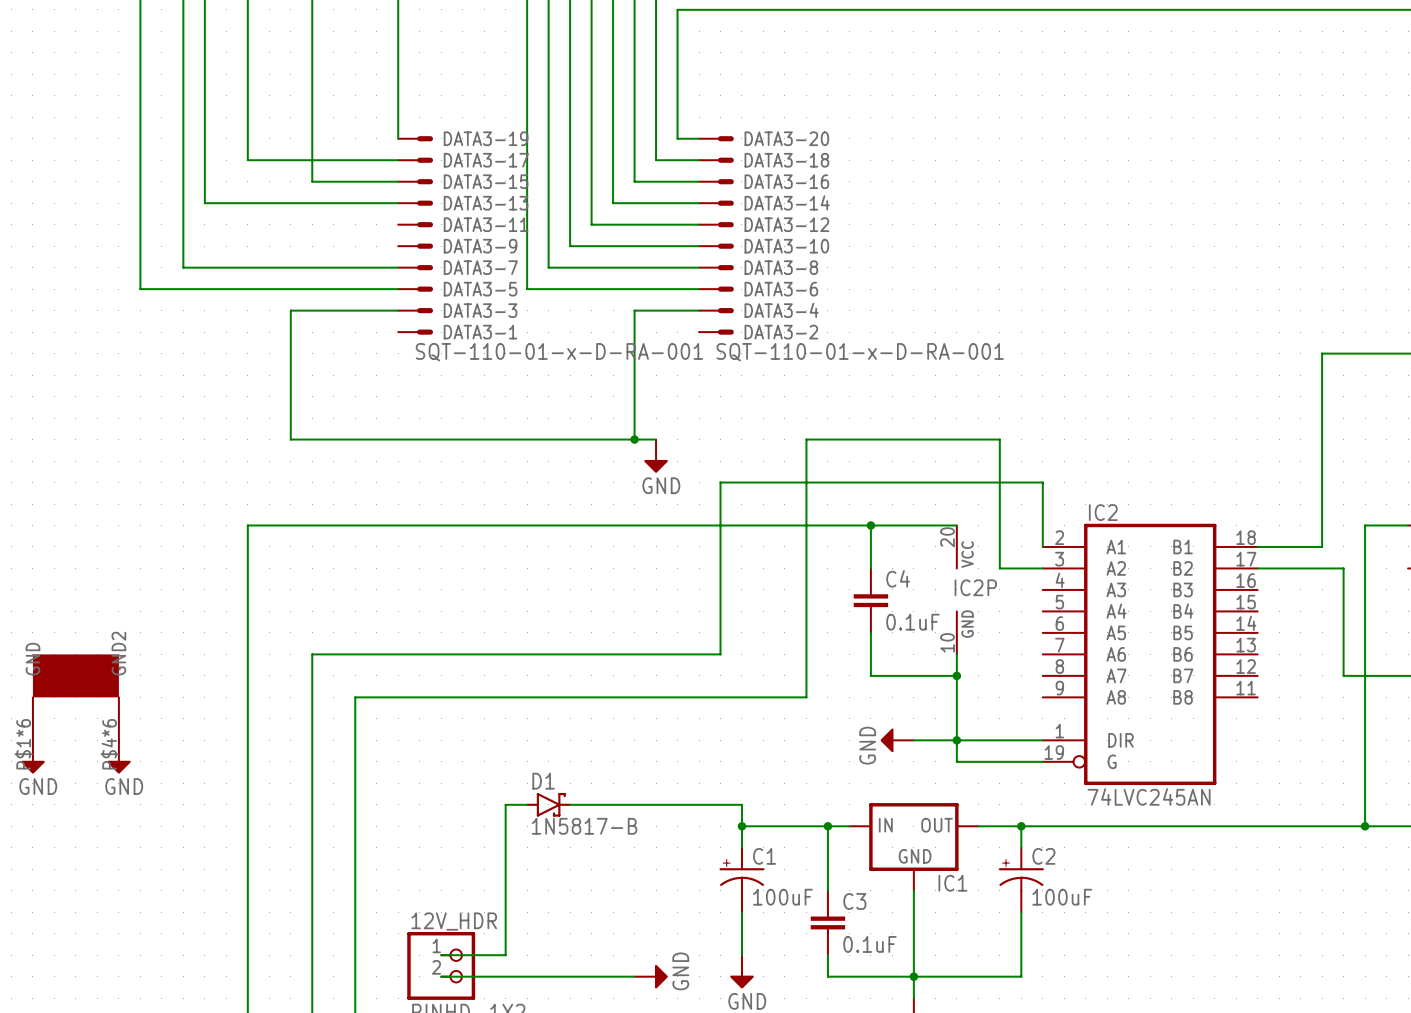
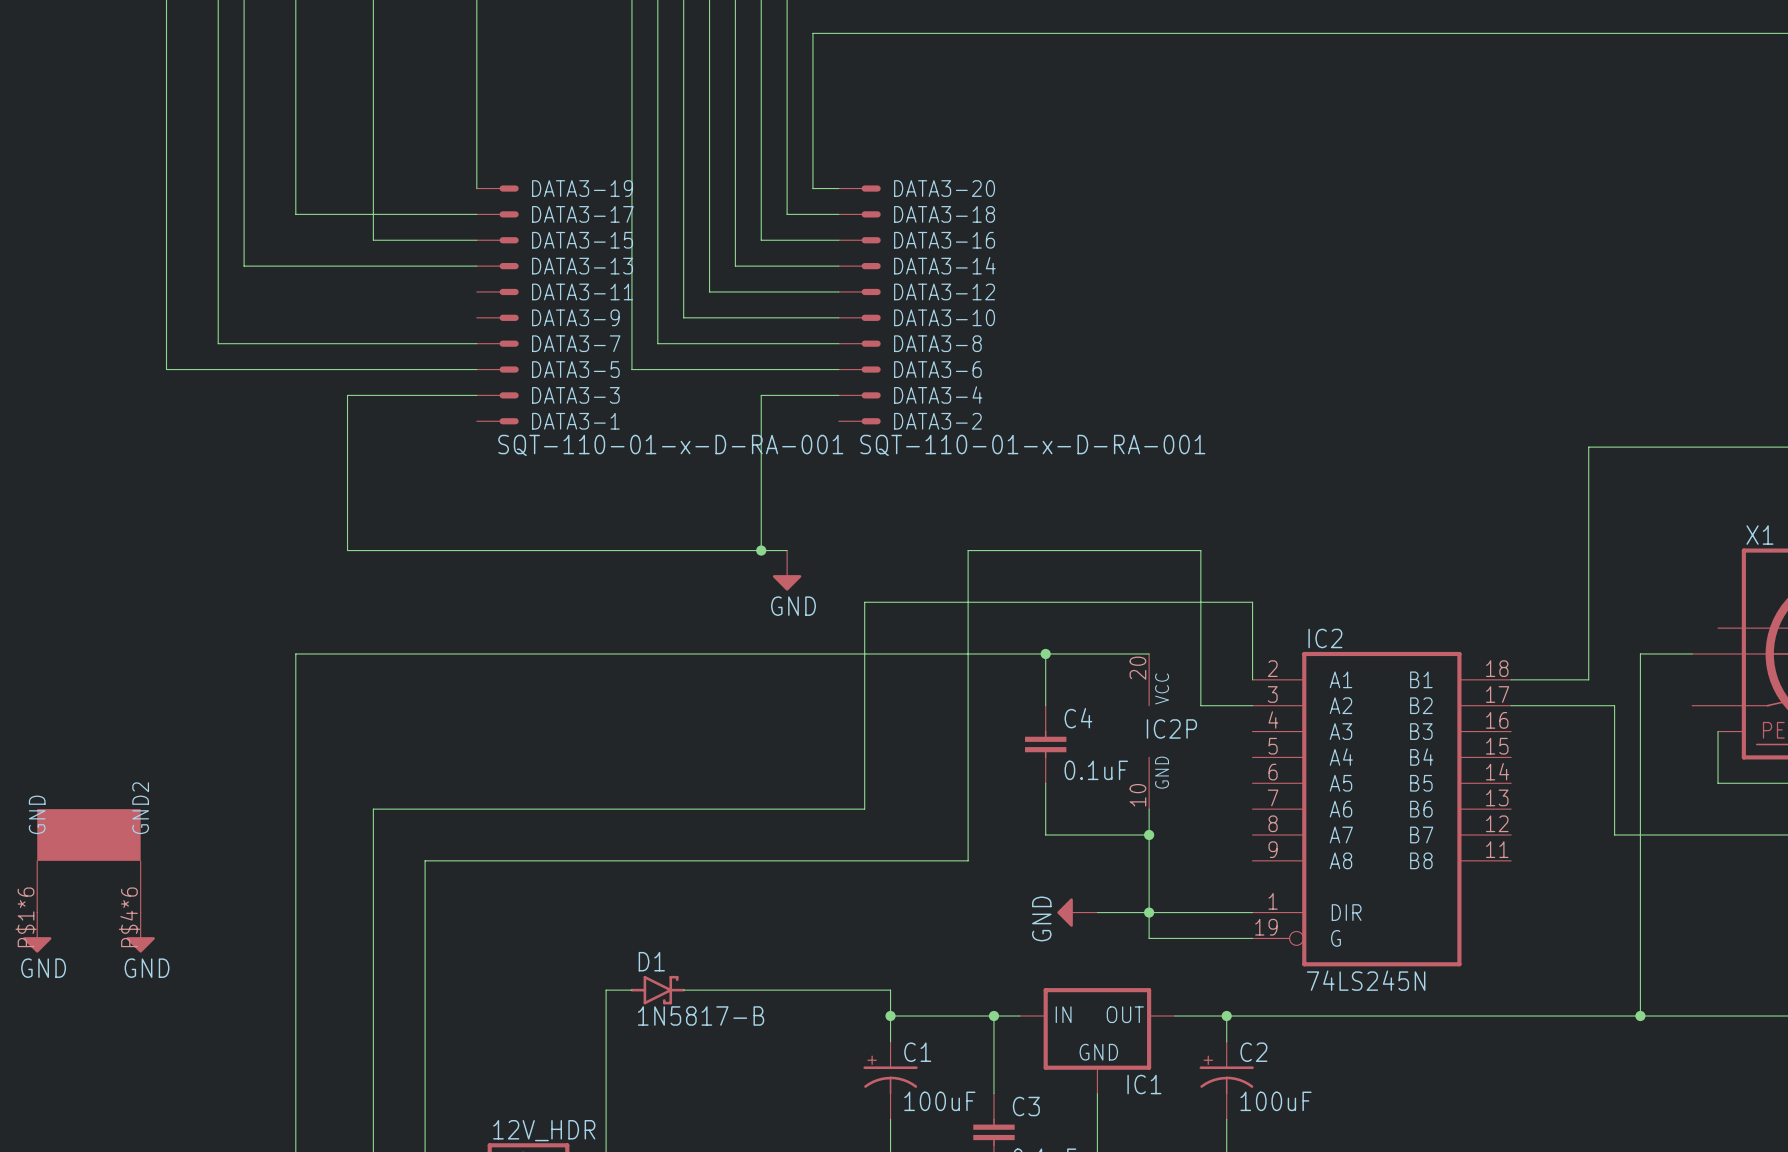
IC2 value: 74LVC245AN (1149, 796) -> 74LS245N (1366, 980)

